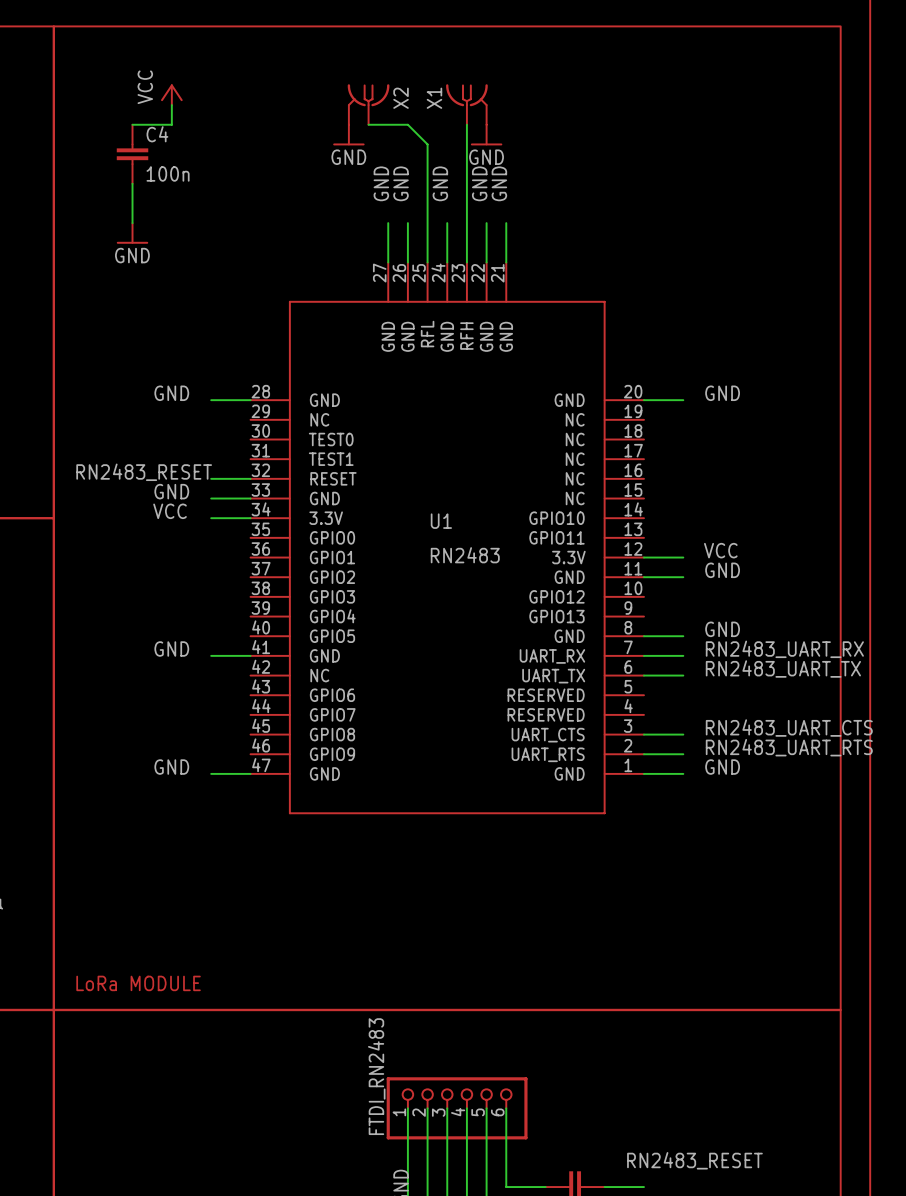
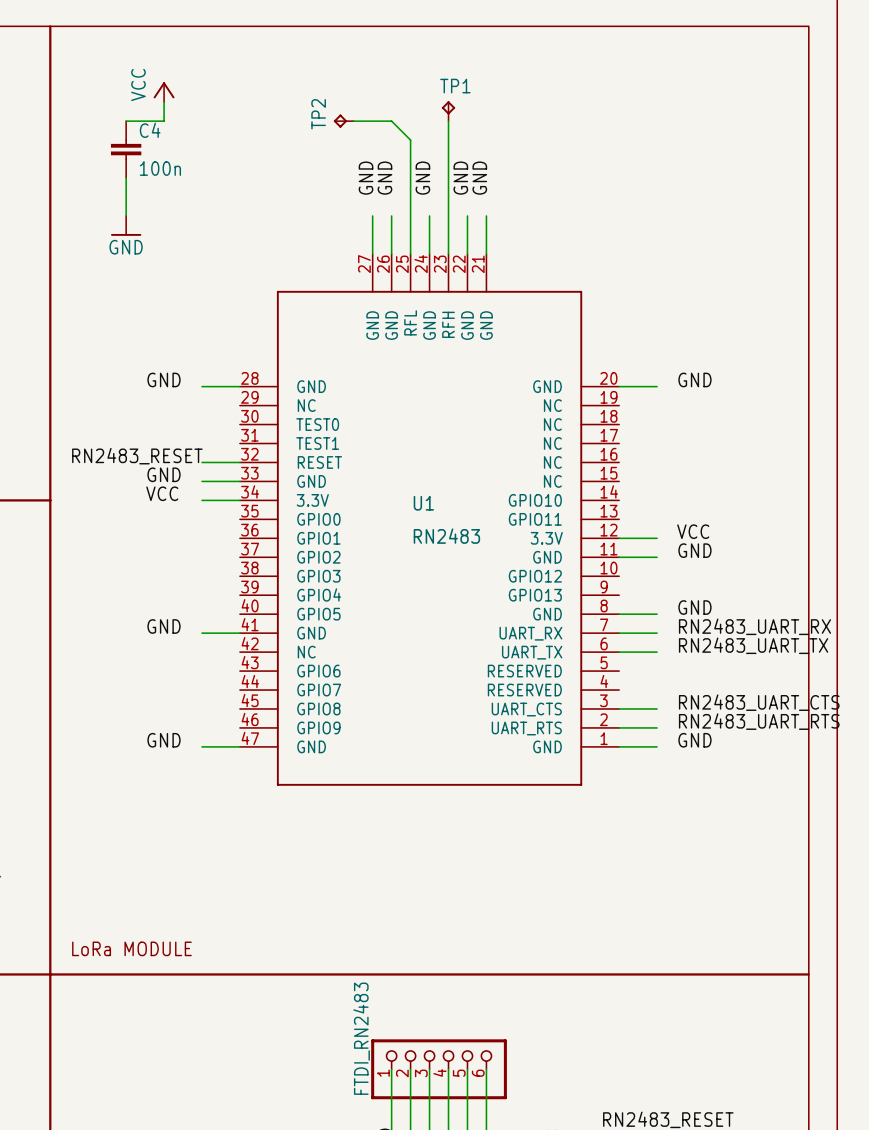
X2: (368, 104) -> none
X1: (466, 104) -> none
TP1: none -> (448, 111)
TP2: none -> (343, 121)
power symbol: GND (348, 135) -> none
power symbol: GND (486, 135) -> none

